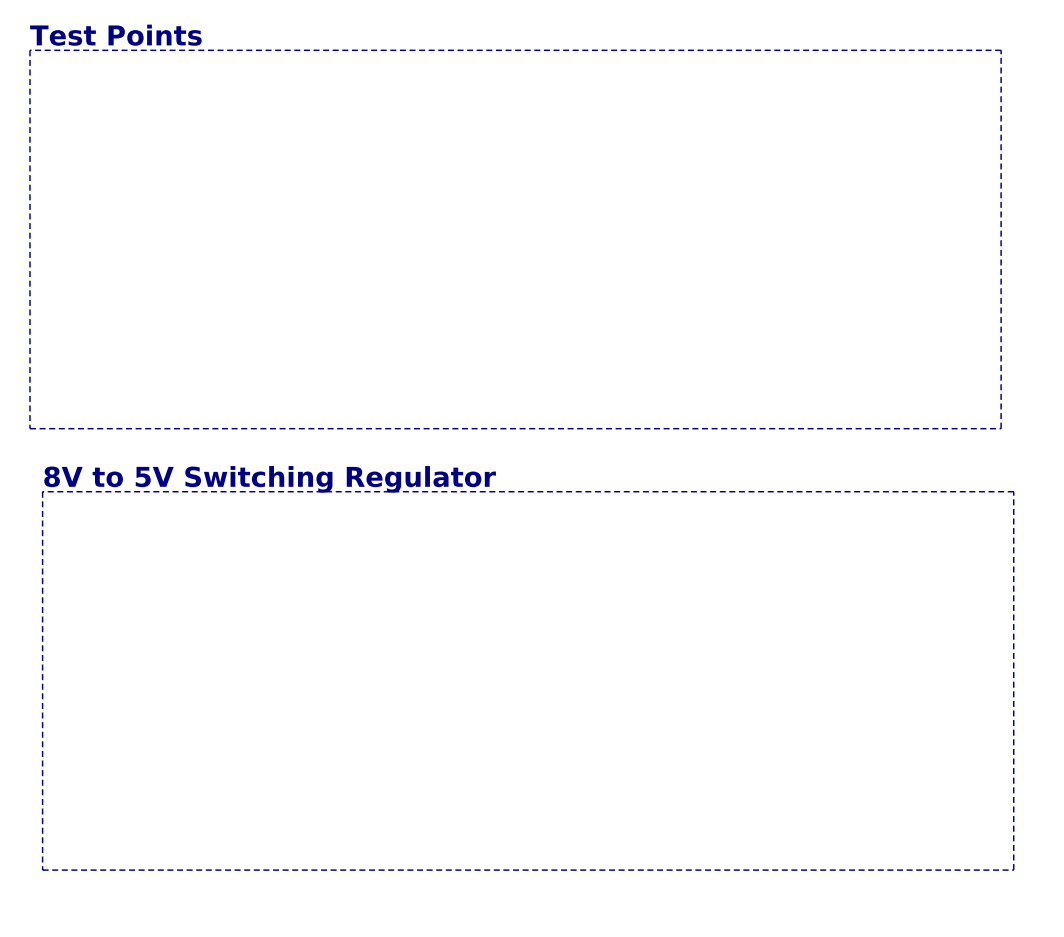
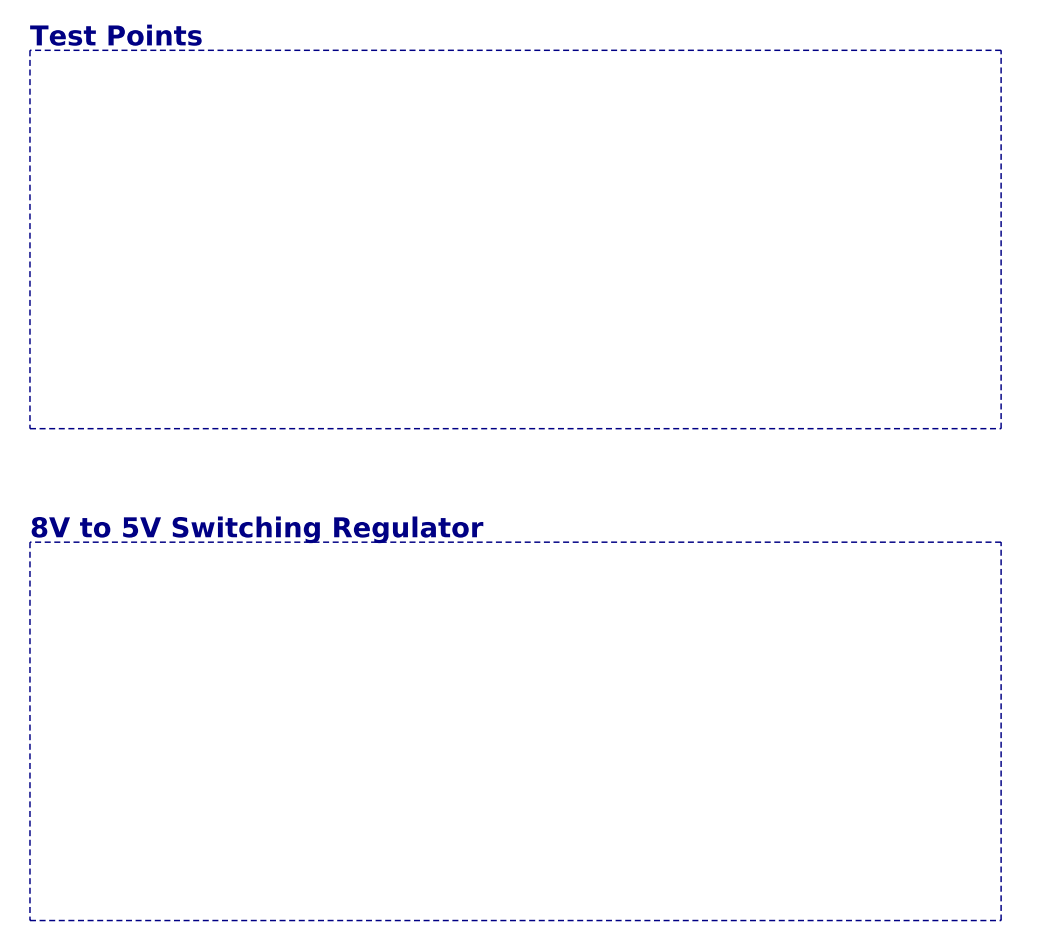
text position: 8V to 5V Switching Regulator (270, 479) -> 8V to 5V Switching Regulator (257, 529)
line: (42, 491) (42, 870) (1013, 870) (1013, 491) (42, 491) -> (29, 542) (29, 920) (1001, 920) (1001, 542) (29, 542)

